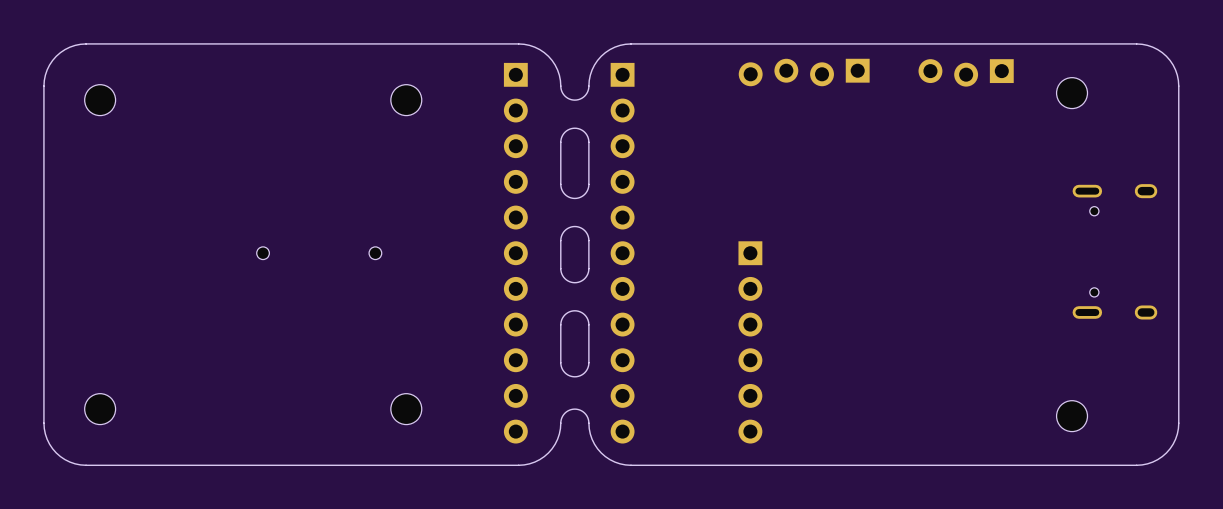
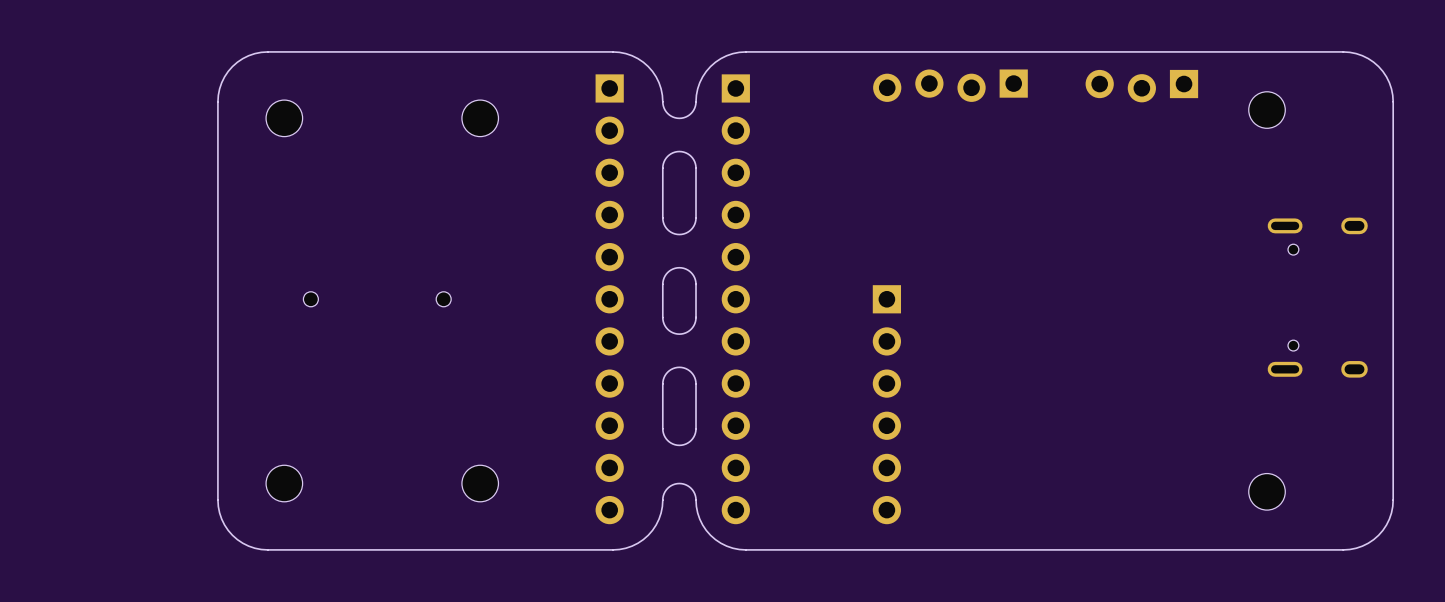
board edge: (226, 43) (75, 45) (65, 49) (52, 60) (47, 69) (43, 86) (43, 423) (47, 439) (60, 456) (80, 464) (226, 465) -> (267, 51) (248, 55) (232, 66) (221, 82) (217, 101) (218, 506) (224, 525) (237, 539) (248, 546) (267, 549)
part position: (100, 100) -> (284, 118)
part position: (100, 409) -> (284, 483)

